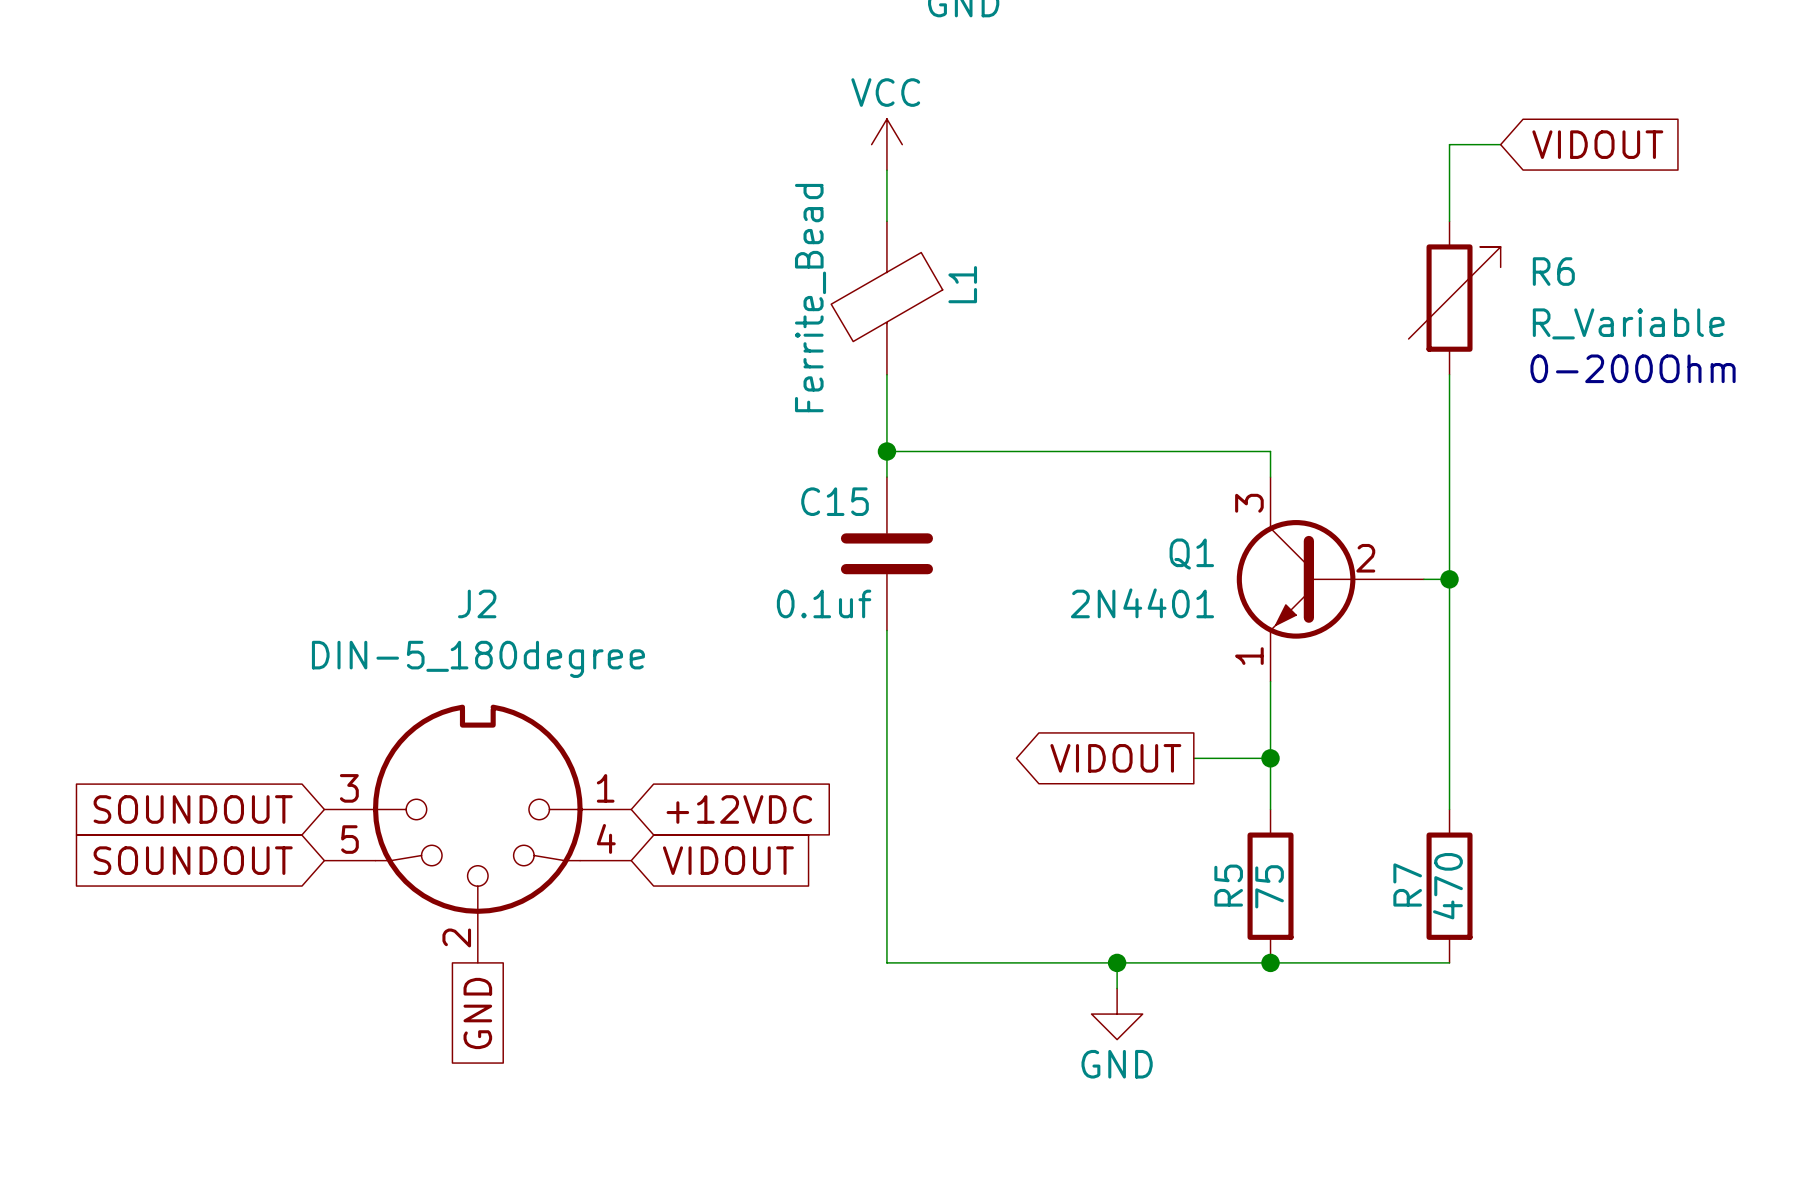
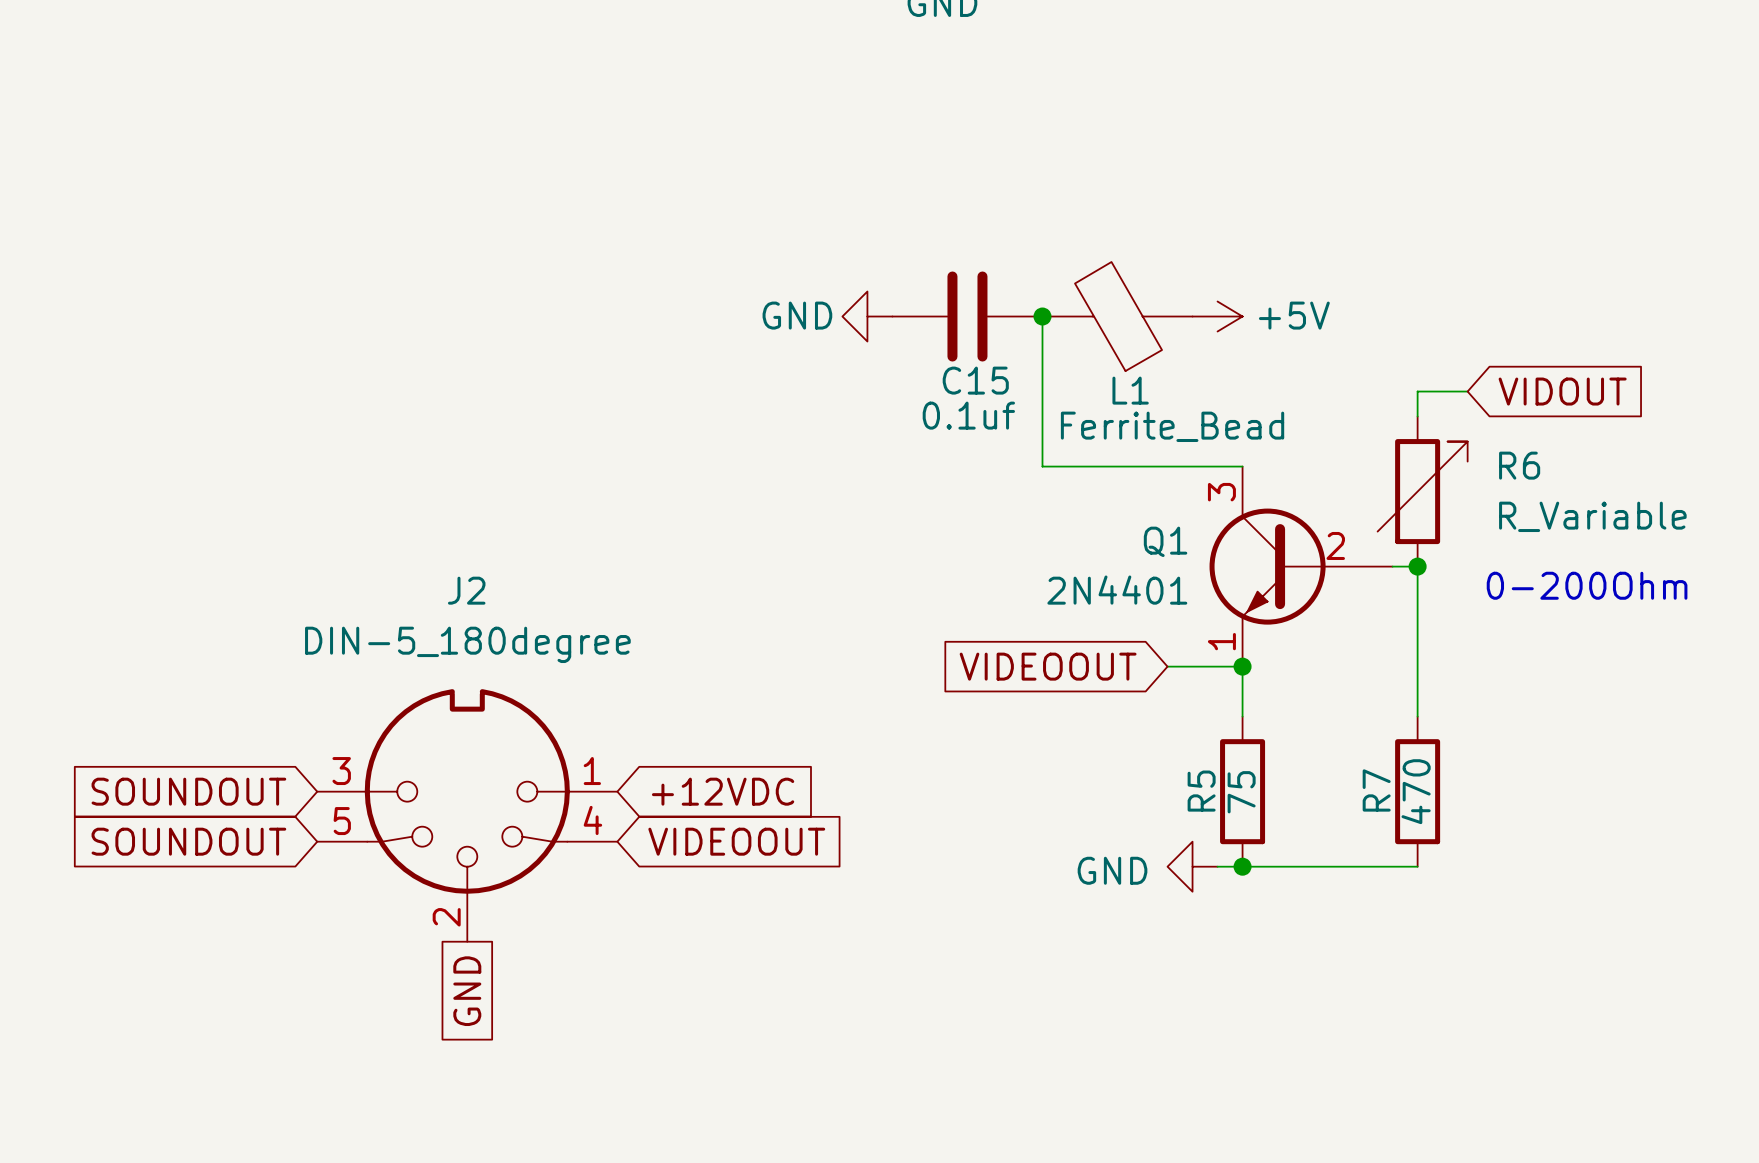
power symbol: VCC (886, 144) -> none
wire: (1500, 144) (1449, 144) (1449, 221) -> none
global label: VIDOUT (1597, 144) -> none
wire: (886, 170) (886, 221) -> none
L1 rotation: 0° (886, 297) -> 90° clockwise (1118, 316)
L1 value position: Ferrite_Bead (810, 298) -> Ferrite_Bead (1172, 426)
L1 position: (886, 298) -> (1117, 316)
R6 position: (1454, 298) -> (1422, 491)
power symbol: none -> GND (867, 316)
junction: none -> (1042, 316)
power symbol: none -> +5V (1217, 316)
text position: 0-200Ohm (1633, 368) -> 0-200Ohm (1587, 585)
wire: (886, 374) (886, 477) -> none
wire: (1449, 374) (1449, 400) -> (1467, 391) (1417, 391)
global label: none -> VIDOUT (1562, 391)
wire: (1449, 425) (1449, 579) -> none
wire: (886, 451) (1270, 451) (1270, 477) -> (1042, 316) (1042, 466) (1242, 466)
junction: (886, 451) -> none
C15 name position: C15 (835, 501) -> C15 (975, 380)
C15 rotation: 0° (886, 553) -> 90° clockwise (967, 316)
C15 position: (886, 553) -> (967, 316)
C15 value position: 0.1uf (824, 603) -> 0.1uf (968, 415)
wire: (886, 630) (886, 962) (1449, 962) -> none
global label: none -> VIDEOOUT (1048, 666)
junction: none -> (1242, 666)
wire: (1270, 732) (1270, 809) -> none
wire: (1449, 732) (1449, 809) -> none
global label: VIDOUT (1115, 758) -> none
wire: (1193, 758) (1270, 758) -> (1167, 666) (1242, 666)
junction: (1270, 758) -> none
global label: VIDOUT (728, 860) -> VIDEOOUT (736, 841)
wire: none -> (1217, 866) (1417, 866)
junction: none -> (1242, 866)
R5 position: (1270, 886) -> (1242, 791)
R7 position: (1449, 886) -> (1417, 791)
wire: (1117, 962) (1117, 988) -> none
junction: (1117, 962) -> none
junction: (1270, 962) -> none
power symbol rotation: 0° (1117, 1014) -> 90° clockwise (1192, 866)
power symbol position: GND (1117, 1014) -> GND (1192, 866)

